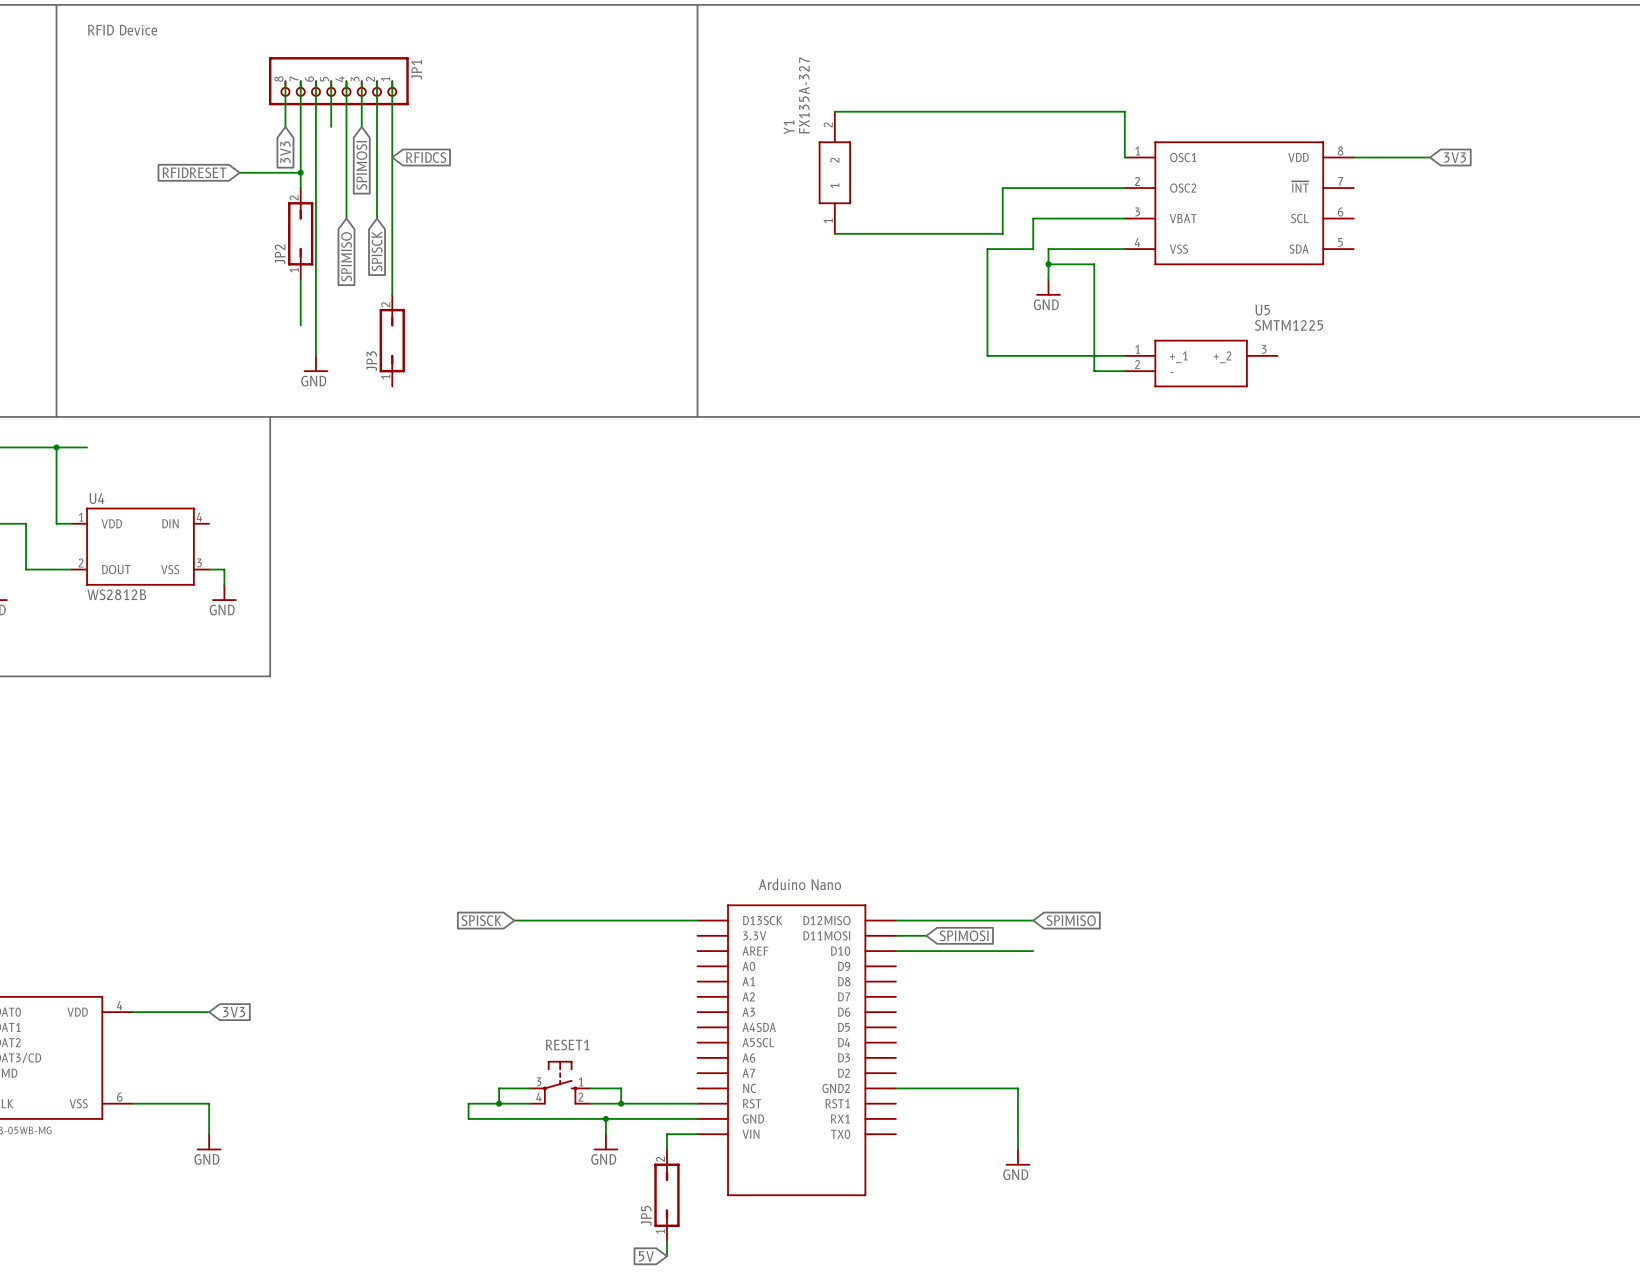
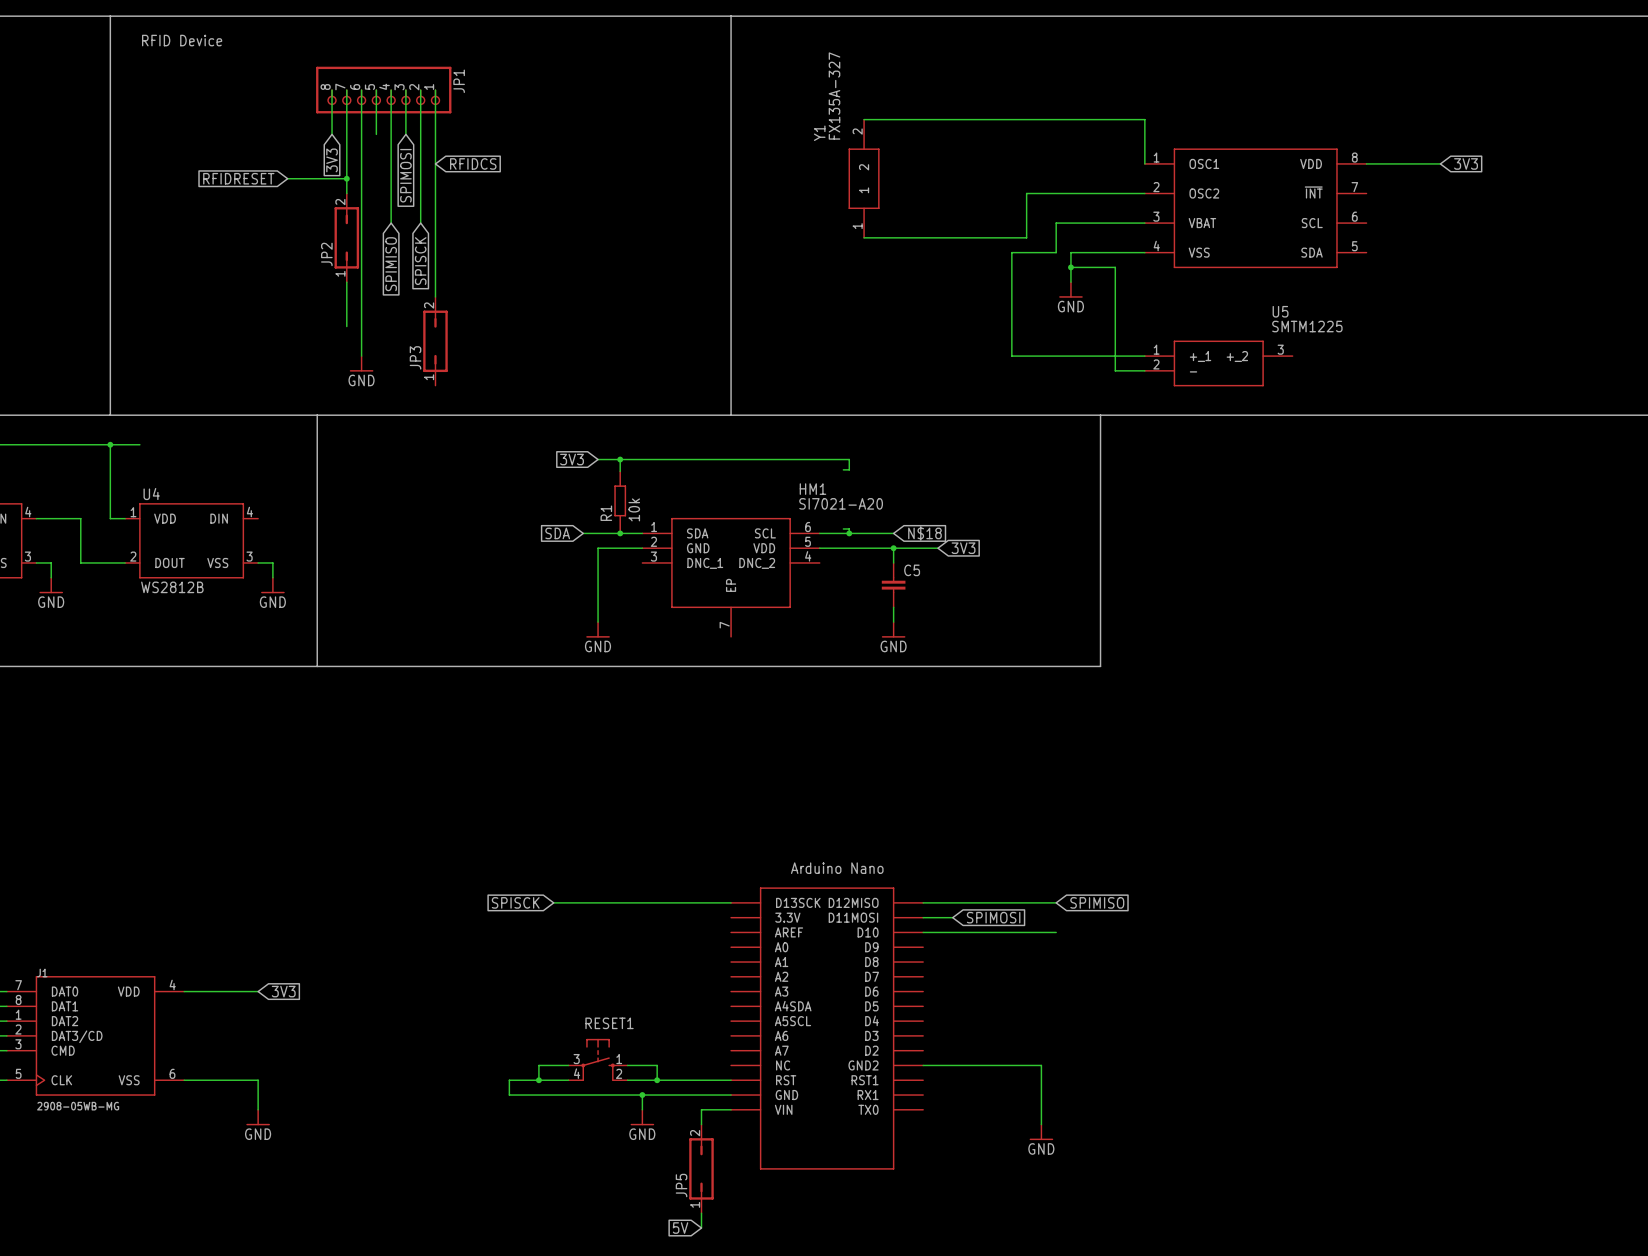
line: none -> (1100, 415) (1100, 666) (317, 666)
global label: none -> 3V3 (572, 459)
wire: none -> (598, 459) (849, 459) (849, 469) (843, 469)
wire: none -> (620, 459) (620, 471)
junction: none -> (620, 459)
R1: none -> 10k (620, 500)
wire: none -> (843, 528) (849, 528) (849, 533)
global label: none -> SDA (557, 533)
wire: none -> (583, 533) (642, 533)
junction: none -> (620, 533)
wire: none -> (819, 533) (893, 533)
junction: none -> (849, 533)
global label: none -> N$18 (924, 533)
wire: none -> (642, 548) (598, 548) (598, 622)
wire: none -> (819, 548) (937, 548)
wire: none -> (893, 548) (893, 562)
junction: none -> (893, 548)
global label: none -> 3V3 (963, 548)
HM1: none -> SI7021-A20 (731, 577)
C5: none -> (893, 585)
wire: none -> (893, 607) (893, 622)
power symbol: none -> GND (598, 629)
power symbol: none -> GND (893, 629)

